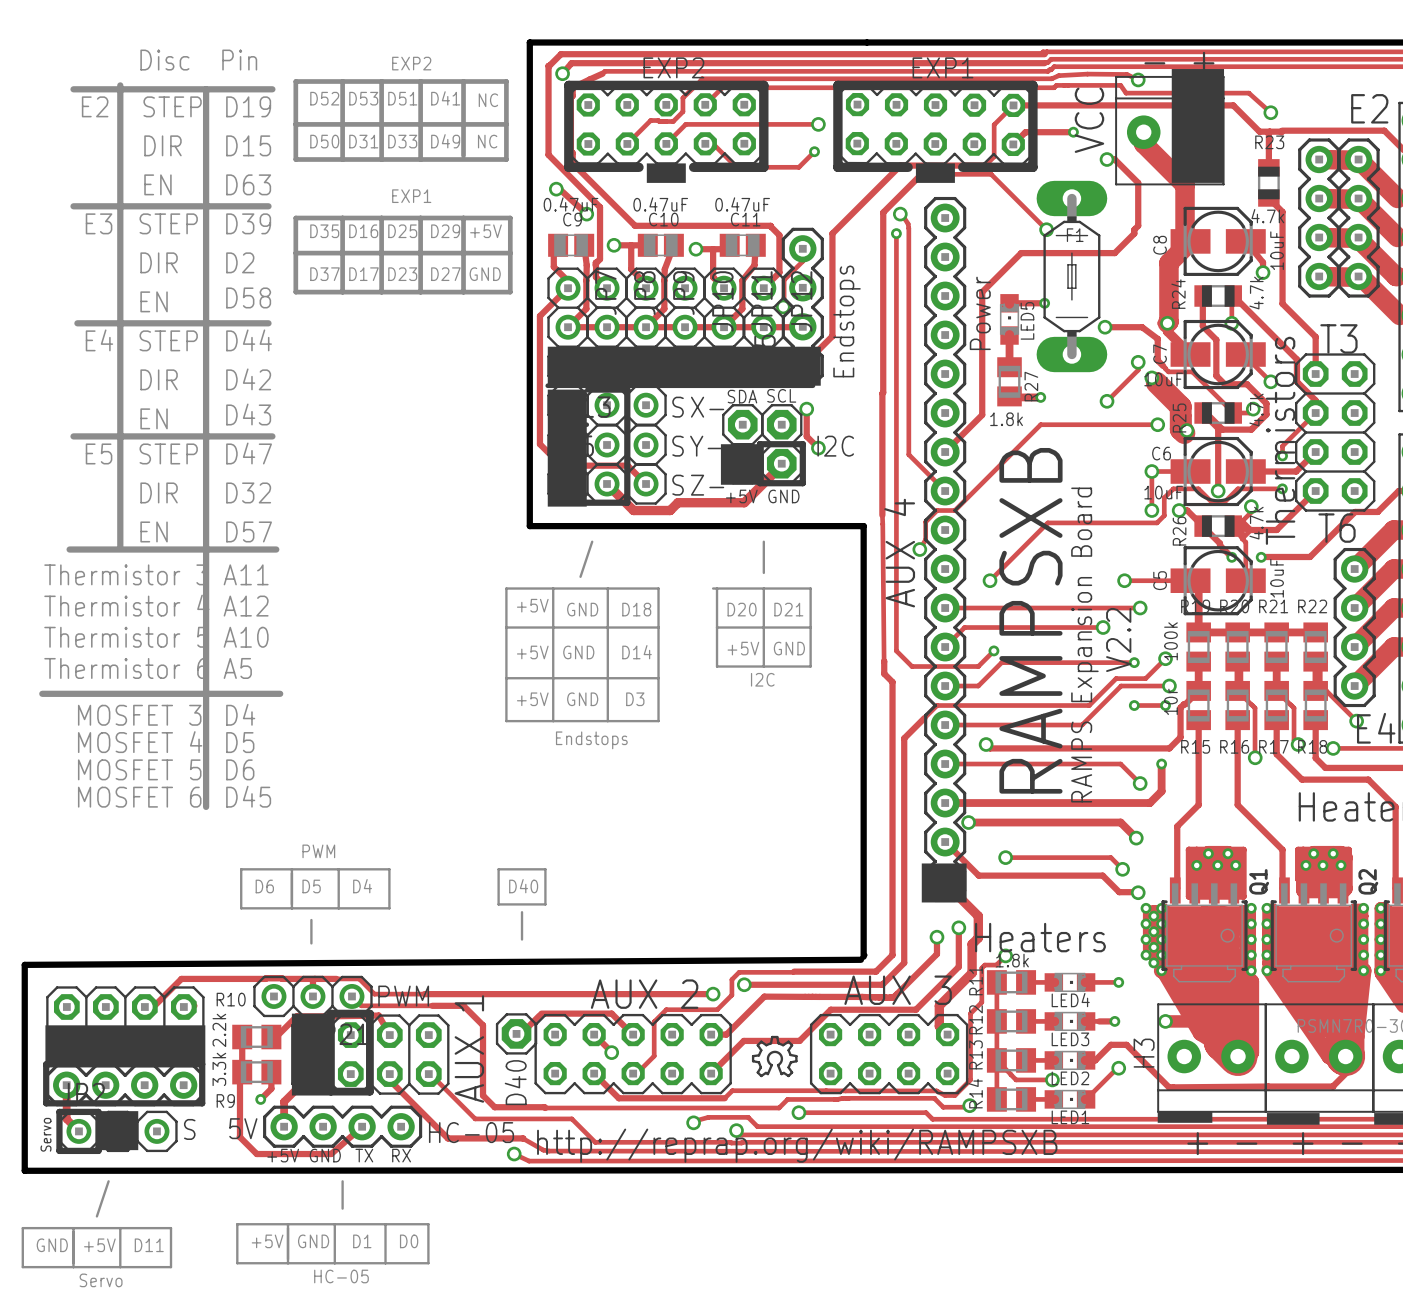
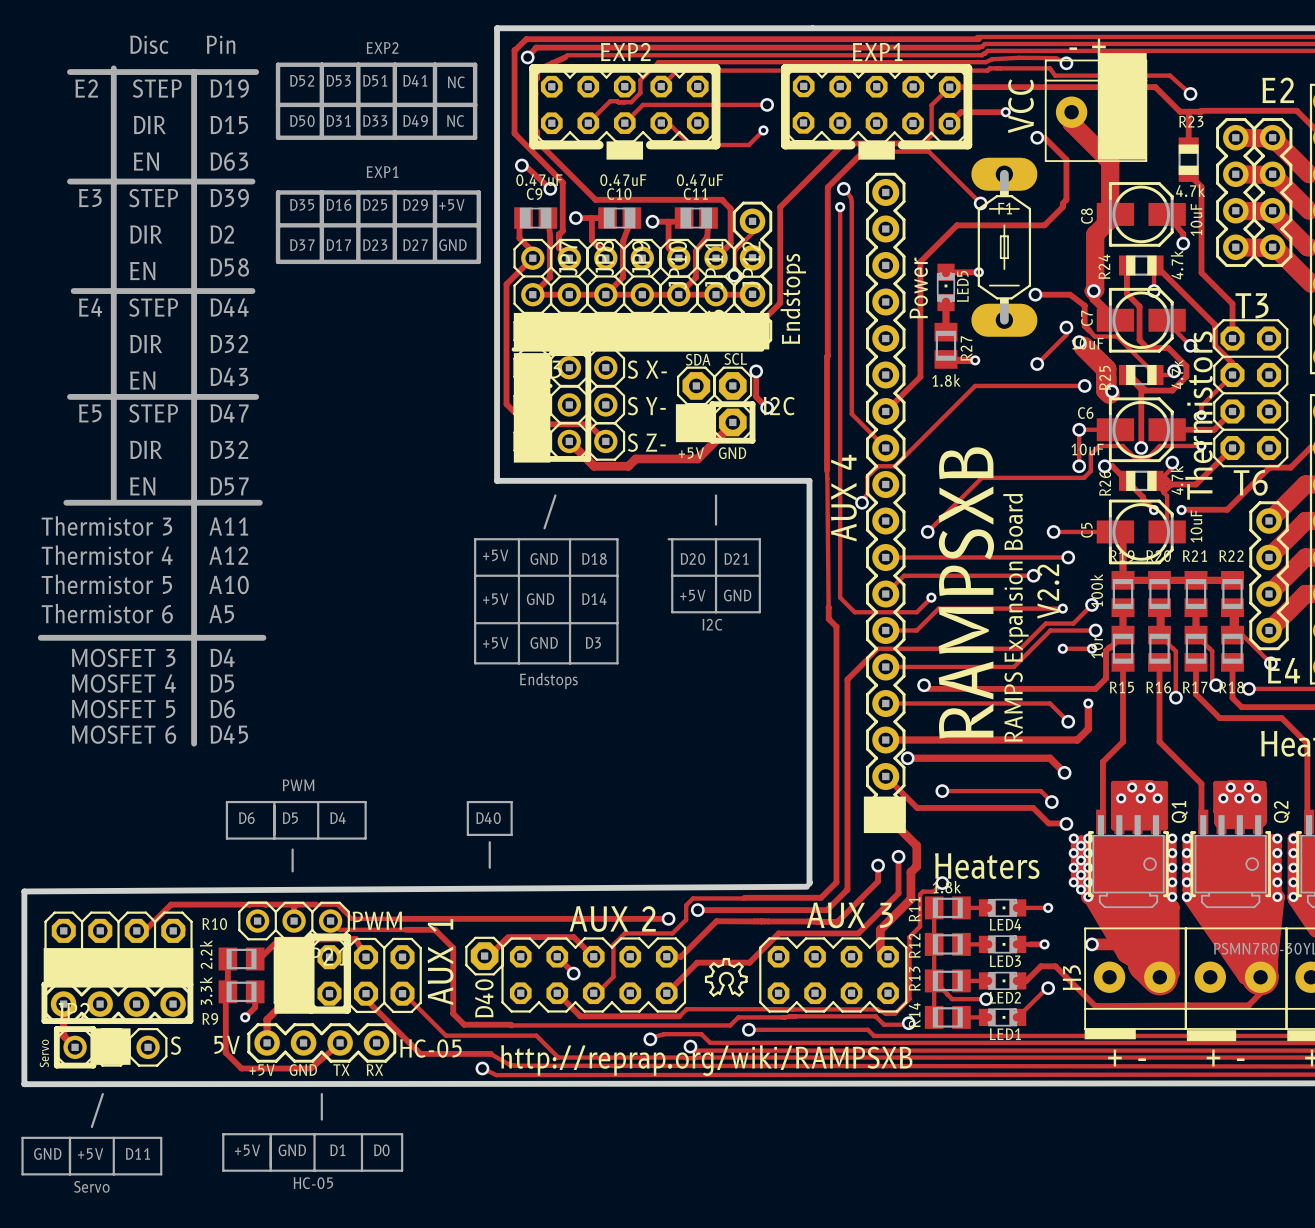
text: D42 (248, 379) -> D32 (229, 343)

